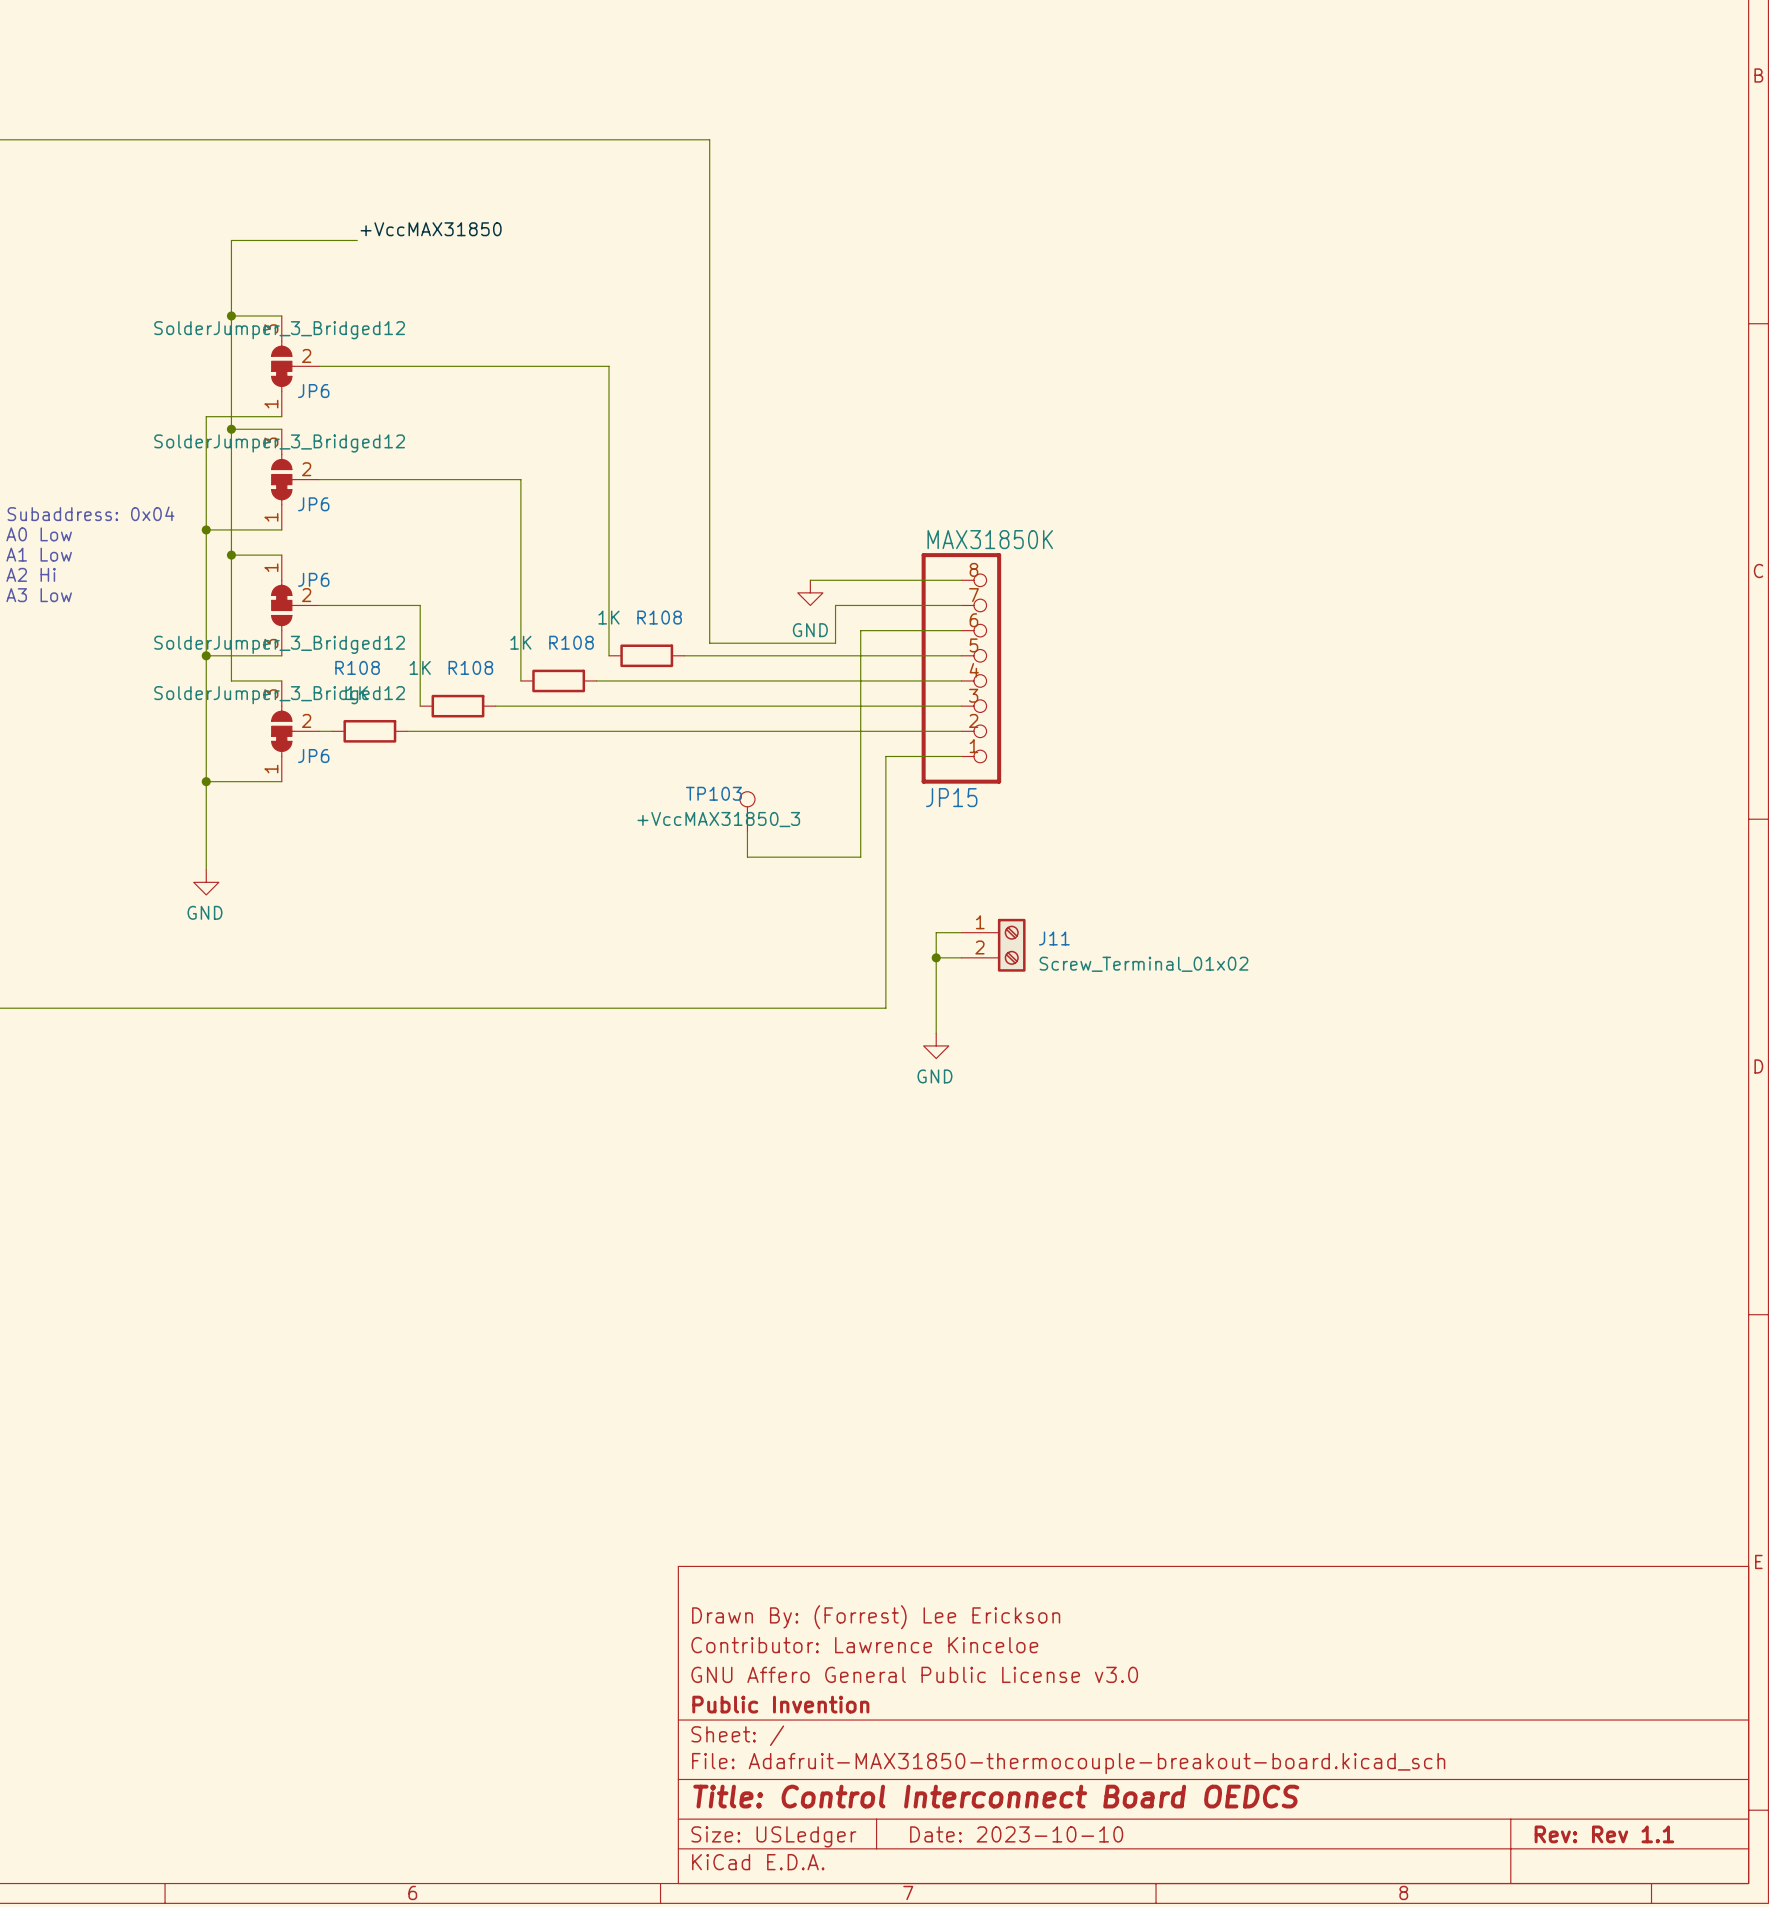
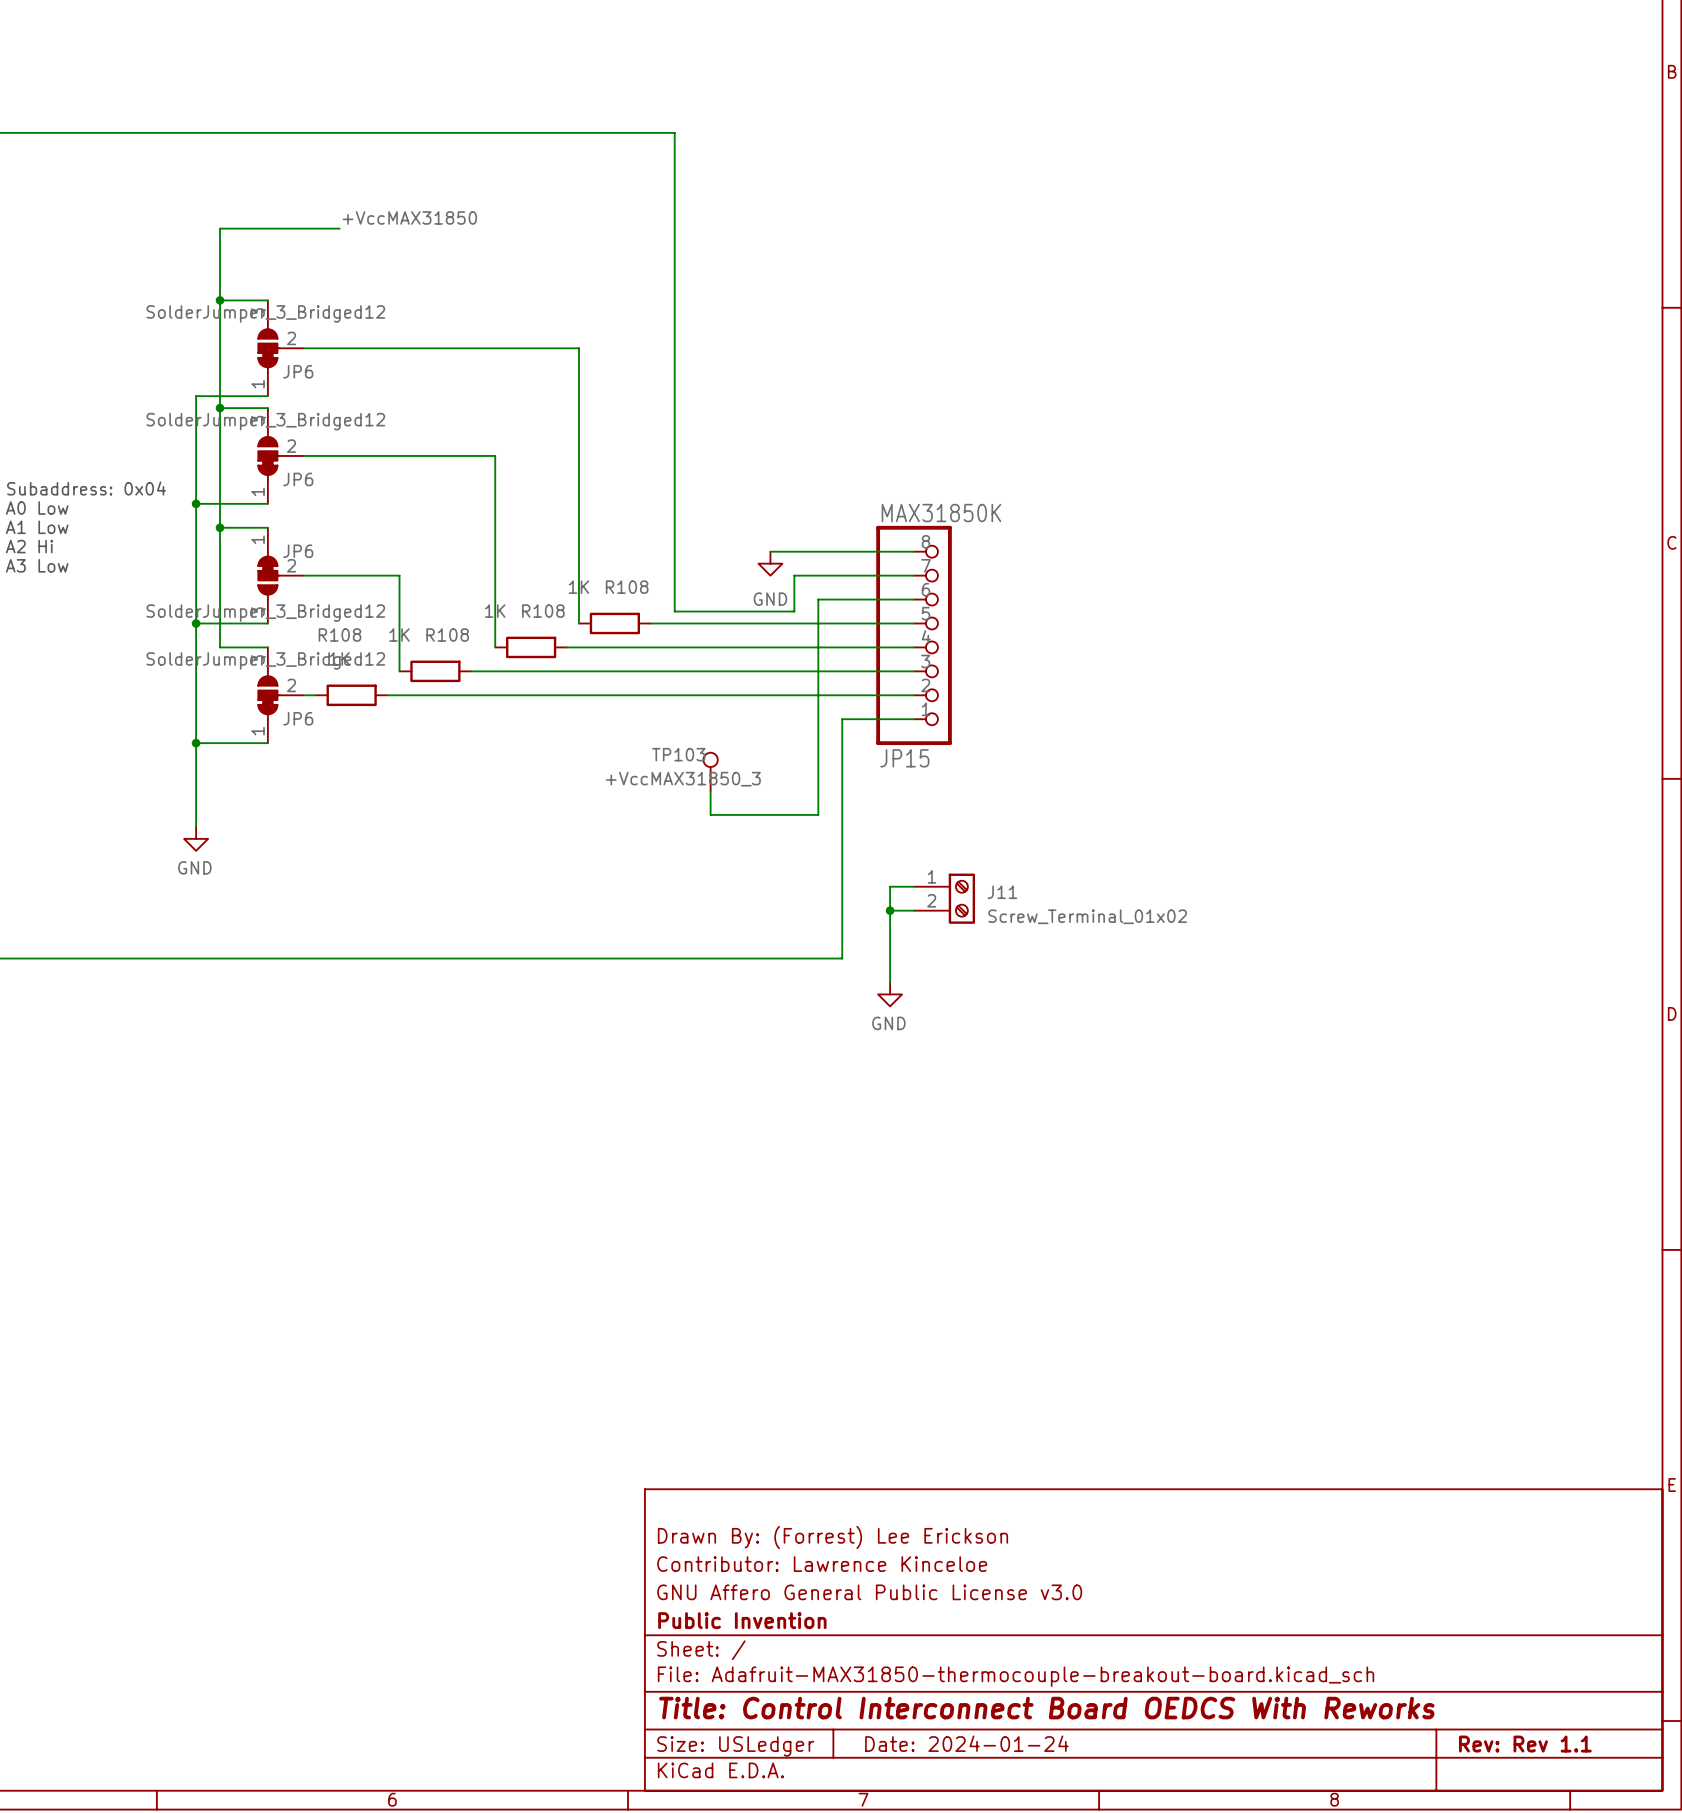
title block: Title: Control Interconnect Board OEDCS (996, 1796) -> Title: Control Interconnect Board OEDCS With Reworks (1046, 1708)
title block: Date: 2023-10-10 (1016, 1834) -> Date: 2024-01-24 (966, 1743)

